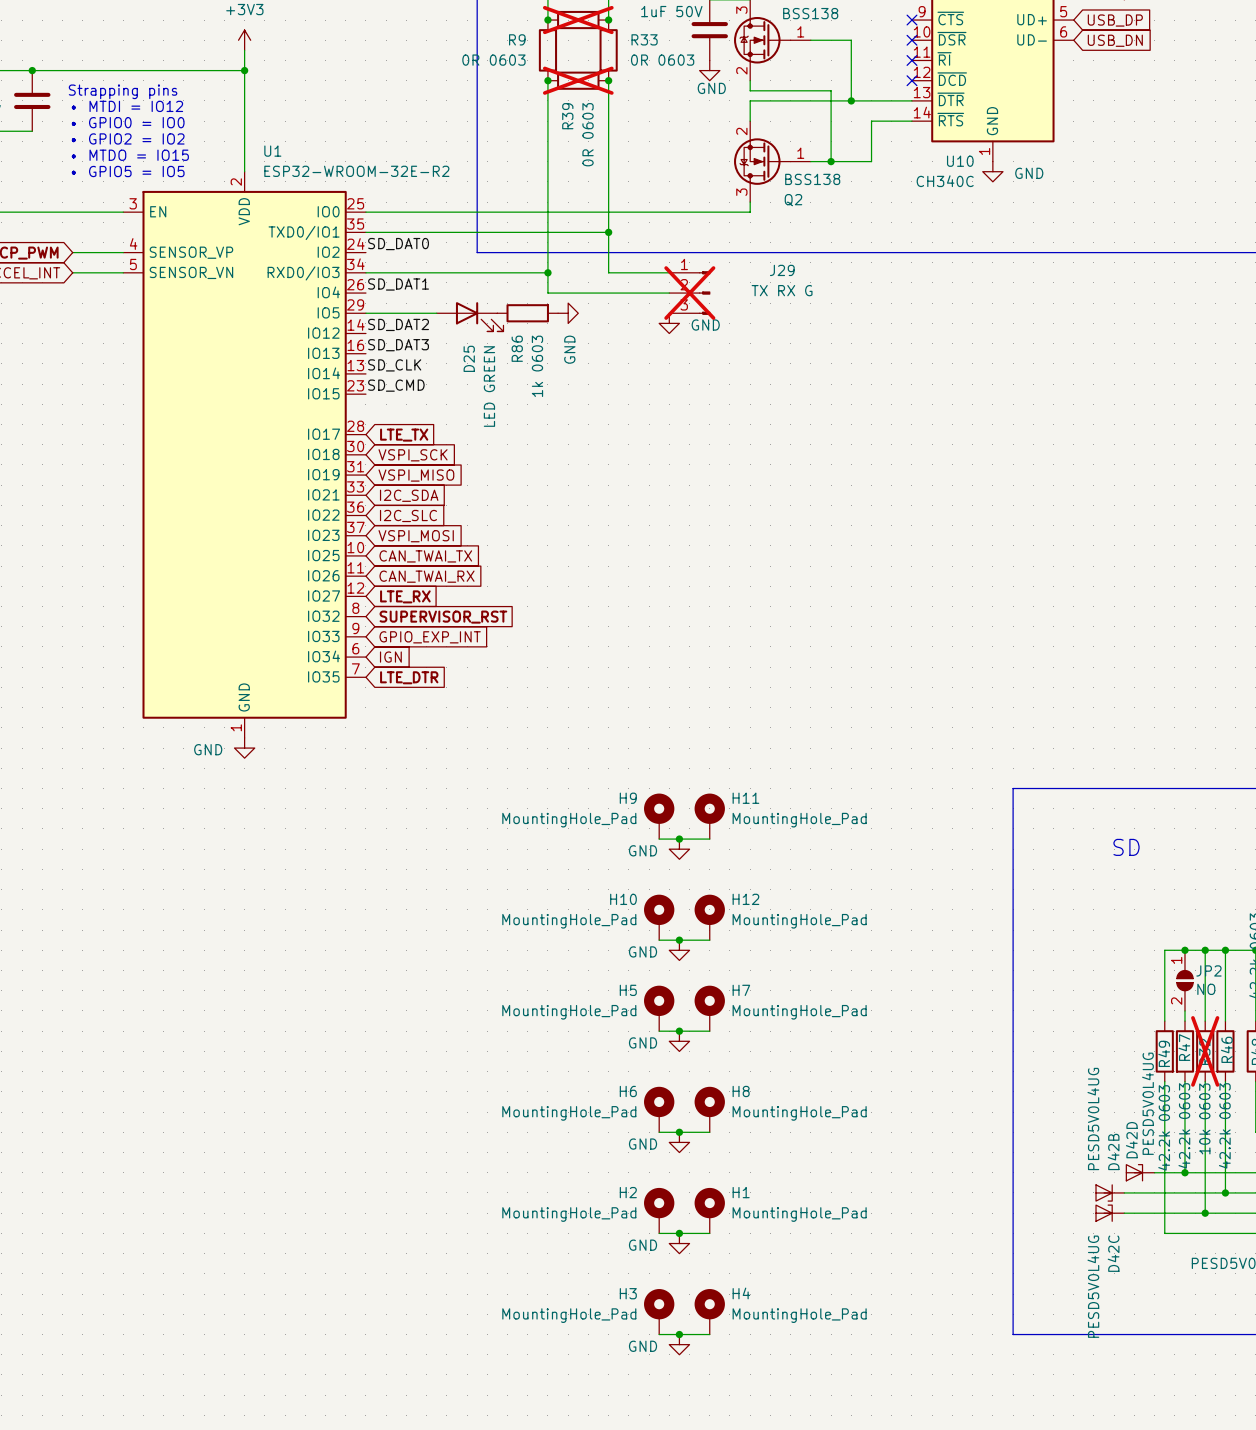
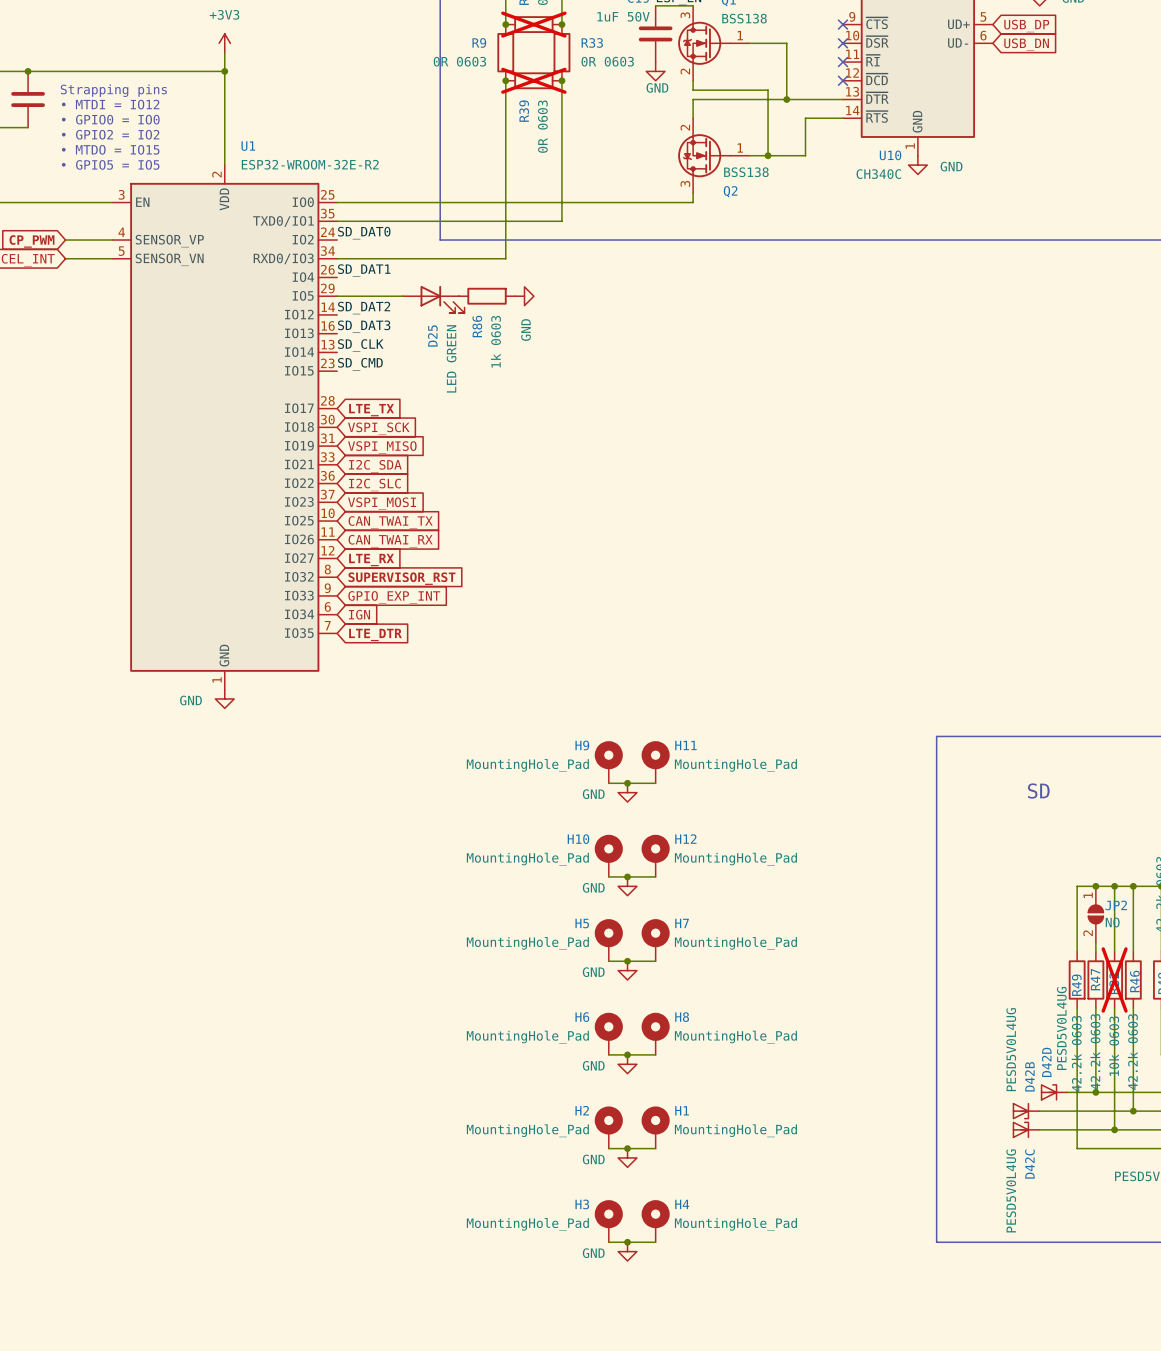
wire: (608, 232) (608, 272) (669, 272) -> none
junction: (608, 232) -> none
wire: (547, 272) (547, 293) (669, 293) -> none
junction: (547, 272) -> none
J29: TX RX G (689, 293) -> none
power symbol: GND (669, 323) -> none

